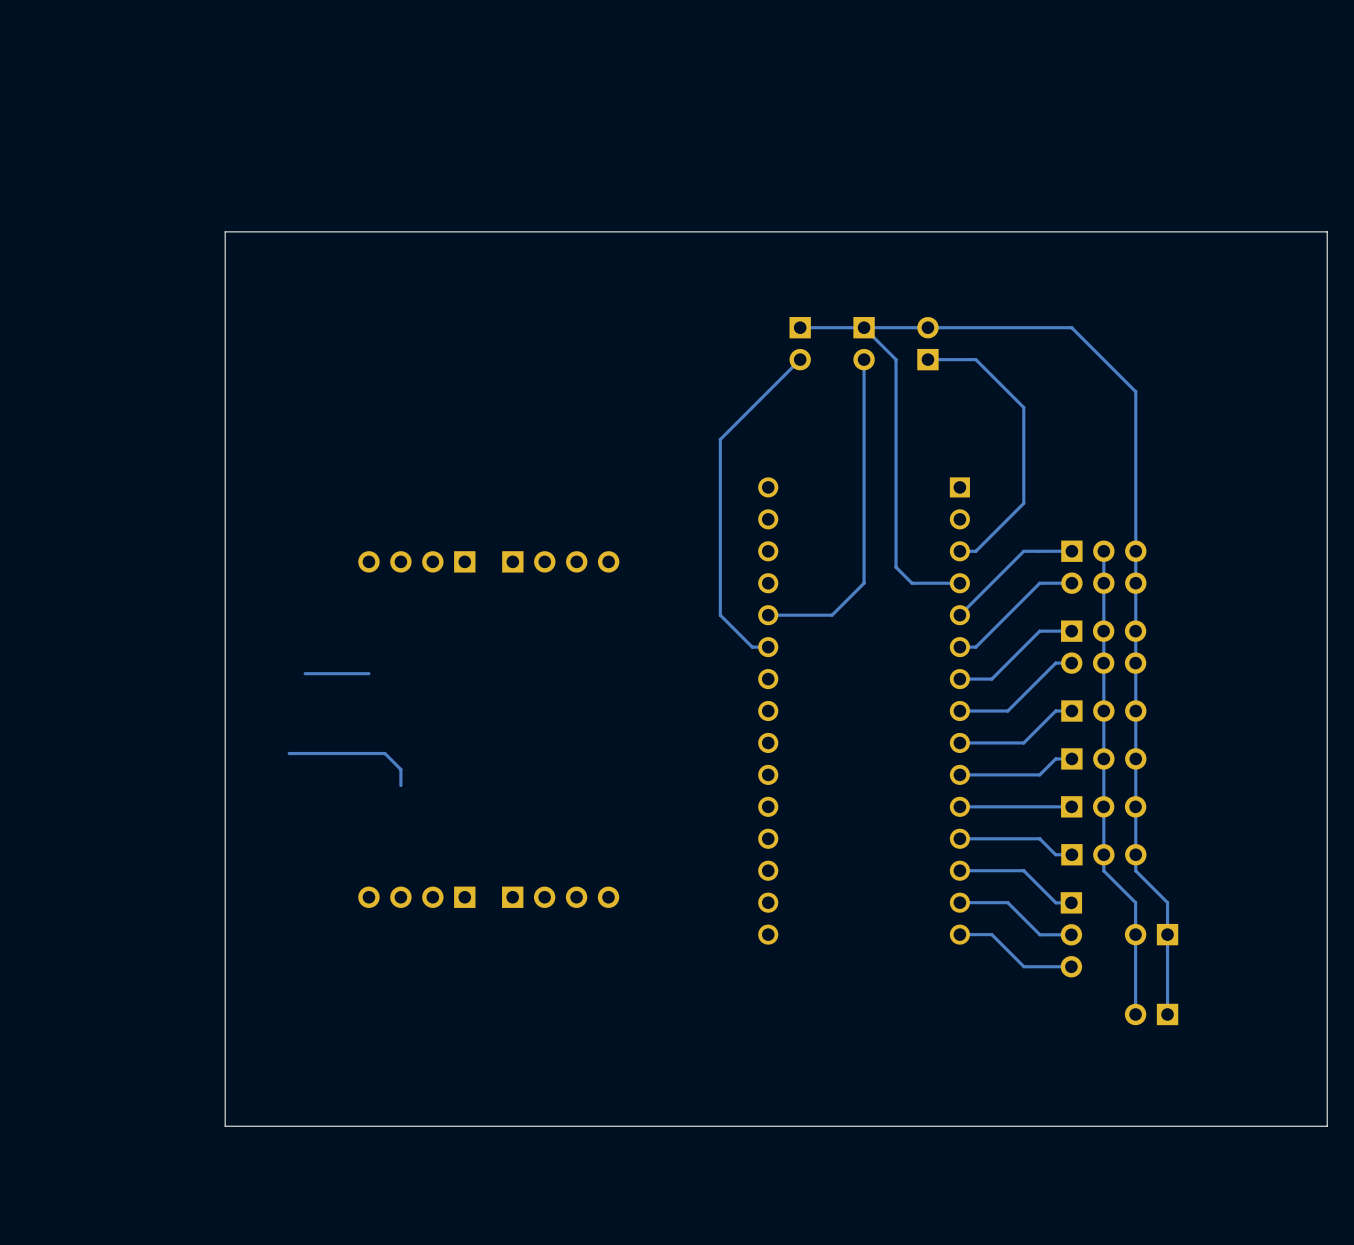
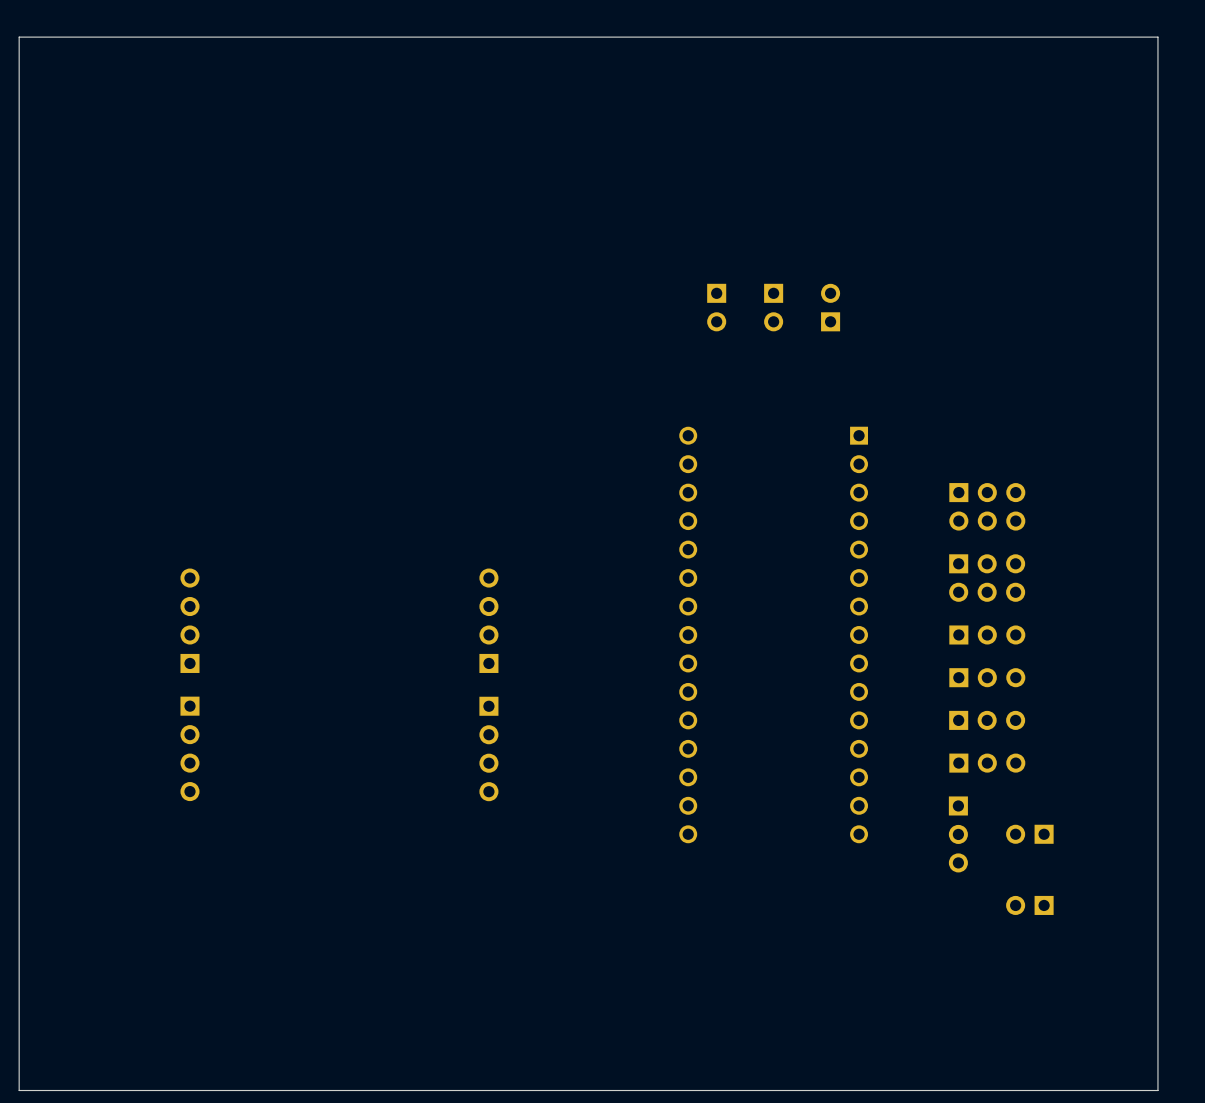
board edge: (1327, 231) (225, 231) (225, 1126) (1327, 1126) (1327, 231) -> (1157, 37) (1157, 1090) (19, 1090) (19, 37) (1157, 37)
track: (800, 327) (1071, 327) (1135, 391) (1135, 870) (1167, 902) (1167, 1014) -> none
track: (864, 327) (896, 359) (896, 567) (911, 583) (959, 583) -> none
track: (800, 359) (720, 439) (720, 615) (752, 647) (768, 647) -> none
track: (864, 359) (864, 583) (832, 615) (768, 615) -> none
track: (927, 359) (975, 359) (1023, 407) (1023, 503) (975, 551) (959, 551) -> none
track: (1071, 551) (1023, 551) (959, 615) -> none
track: (1103, 551) (1103, 870) (1135, 902) (1135, 1014) -> none
part: (416, 561) -> none
part: (560, 561) -> none
track: (1071, 583) (1039, 583) (975, 647) (959, 647) -> none
track: (1071, 631) (1039, 631) (991, 679) (959, 679) -> none
track: (1071, 663) (1055, 663) (1007, 711) (959, 711) -> none
track: (368, 673) (305, 673) -> none
part: none -> (189, 620)
part: none -> (488, 620)
track: (1071, 711) (1055, 711) (1023, 742) (959, 742) -> none
track: (289, 753) (384, 753) (400, 769) (400, 785) -> none
track: (1071, 758) (1055, 758) (1039, 774) (959, 774) -> none
track: (1071, 806) (959, 806) -> none
part: none -> (189, 748)
track: (959, 838) (1039, 838) (1055, 854) (1071, 854) -> none
track: (959, 870) (1023, 870) (1055, 902) (1071, 902) -> none
part: (416, 897) -> none
part rotation: 0° (560, 897) -> 90° clockwise (488, 748)
track: (959, 902) (1007, 902) (1039, 934) (1071, 934) -> none
track: (959, 934) (991, 934) (1023, 966) (1071, 966) -> none

